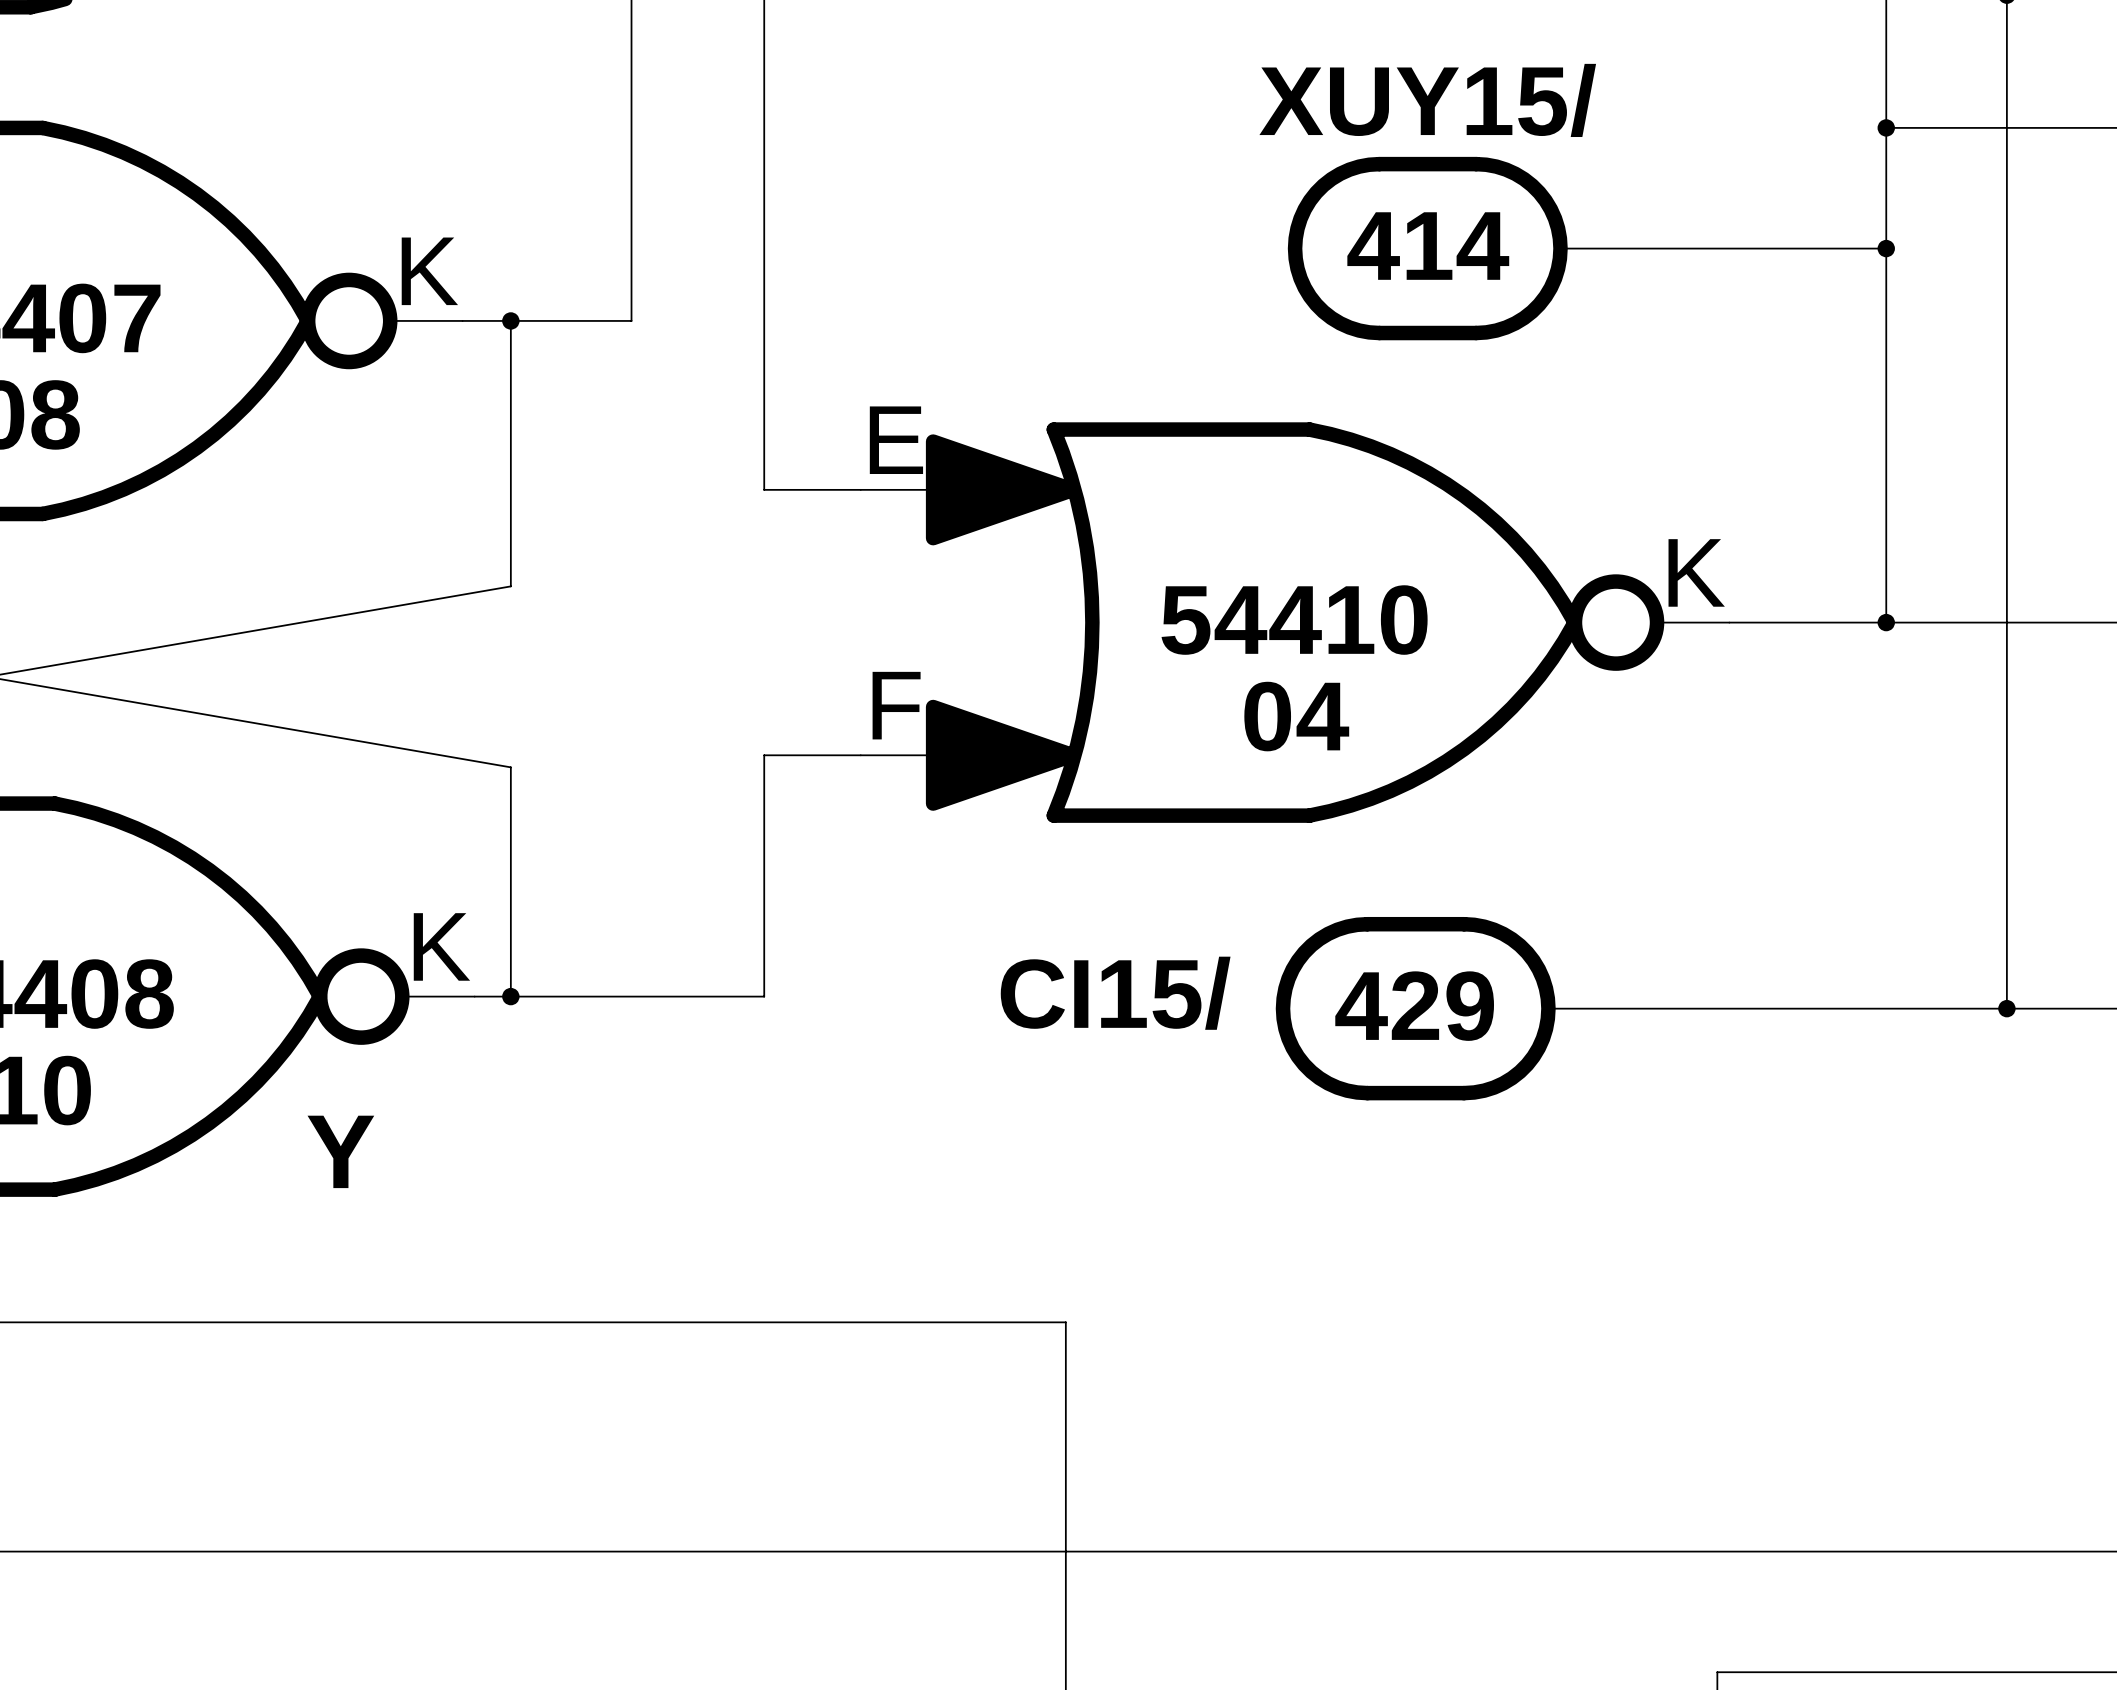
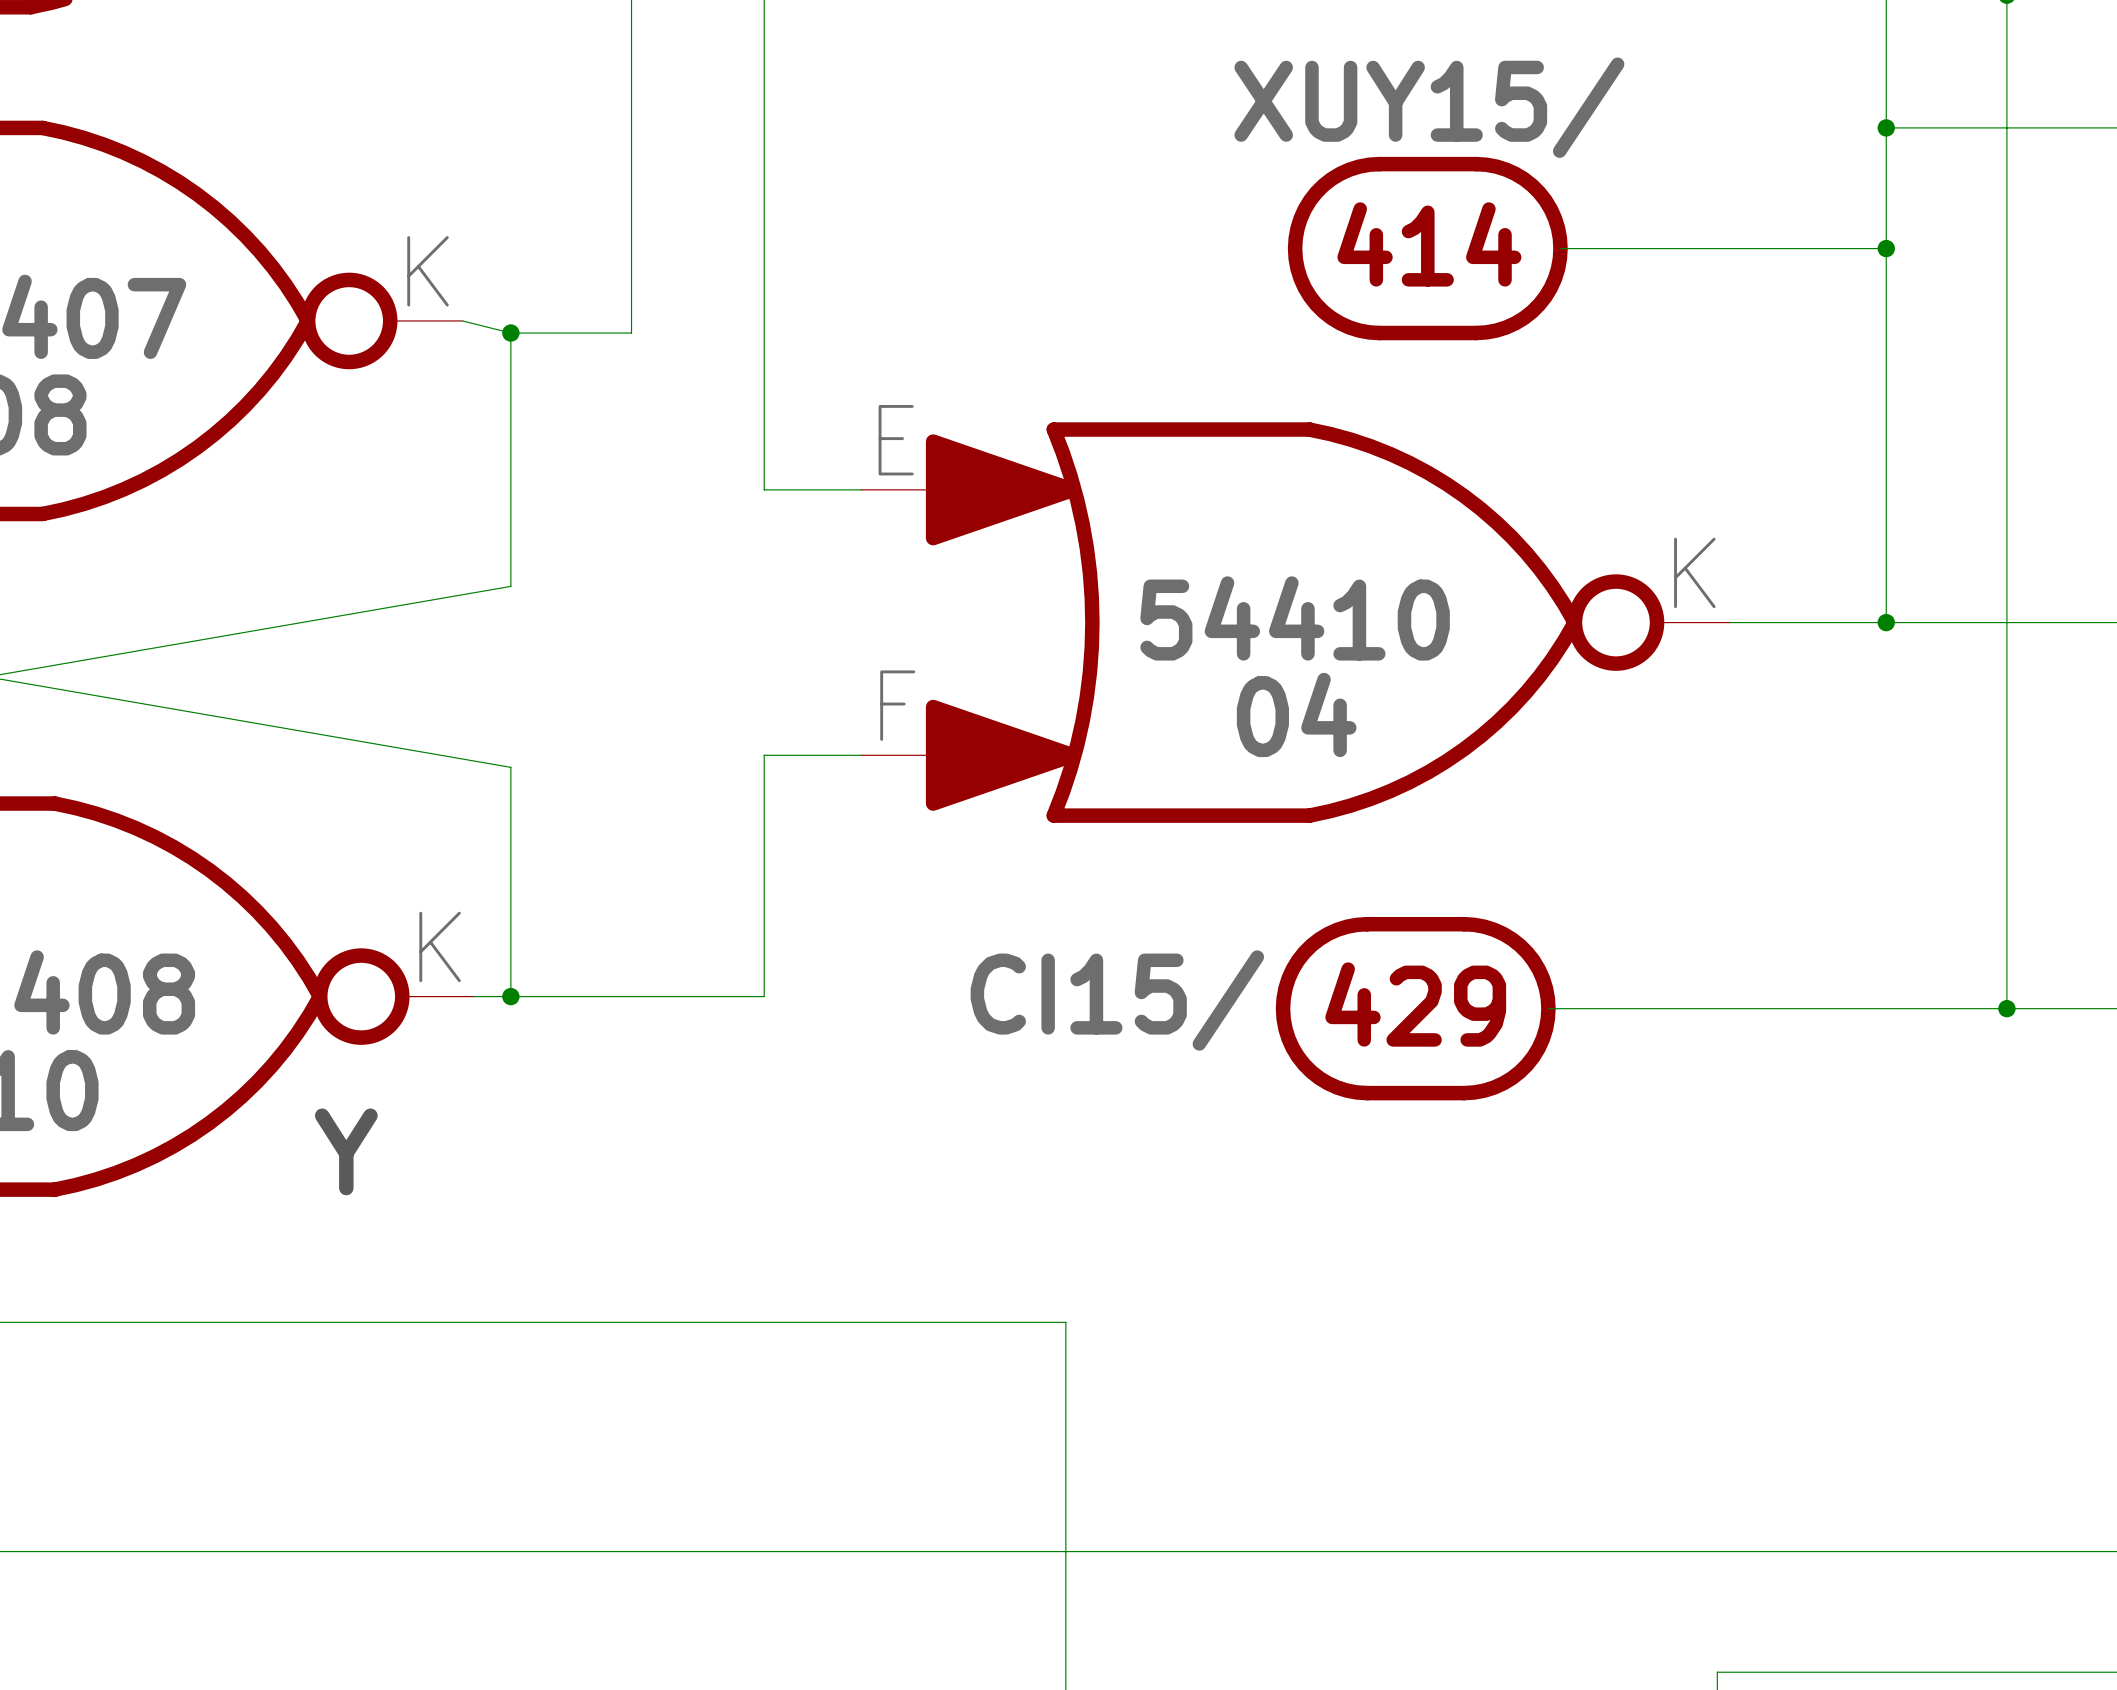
wire: (462, 320) (631, 320) -> (462, 320) (510, 333) (631, 333) (631, 320)
junction position: (510, 320) -> (510, 333)

